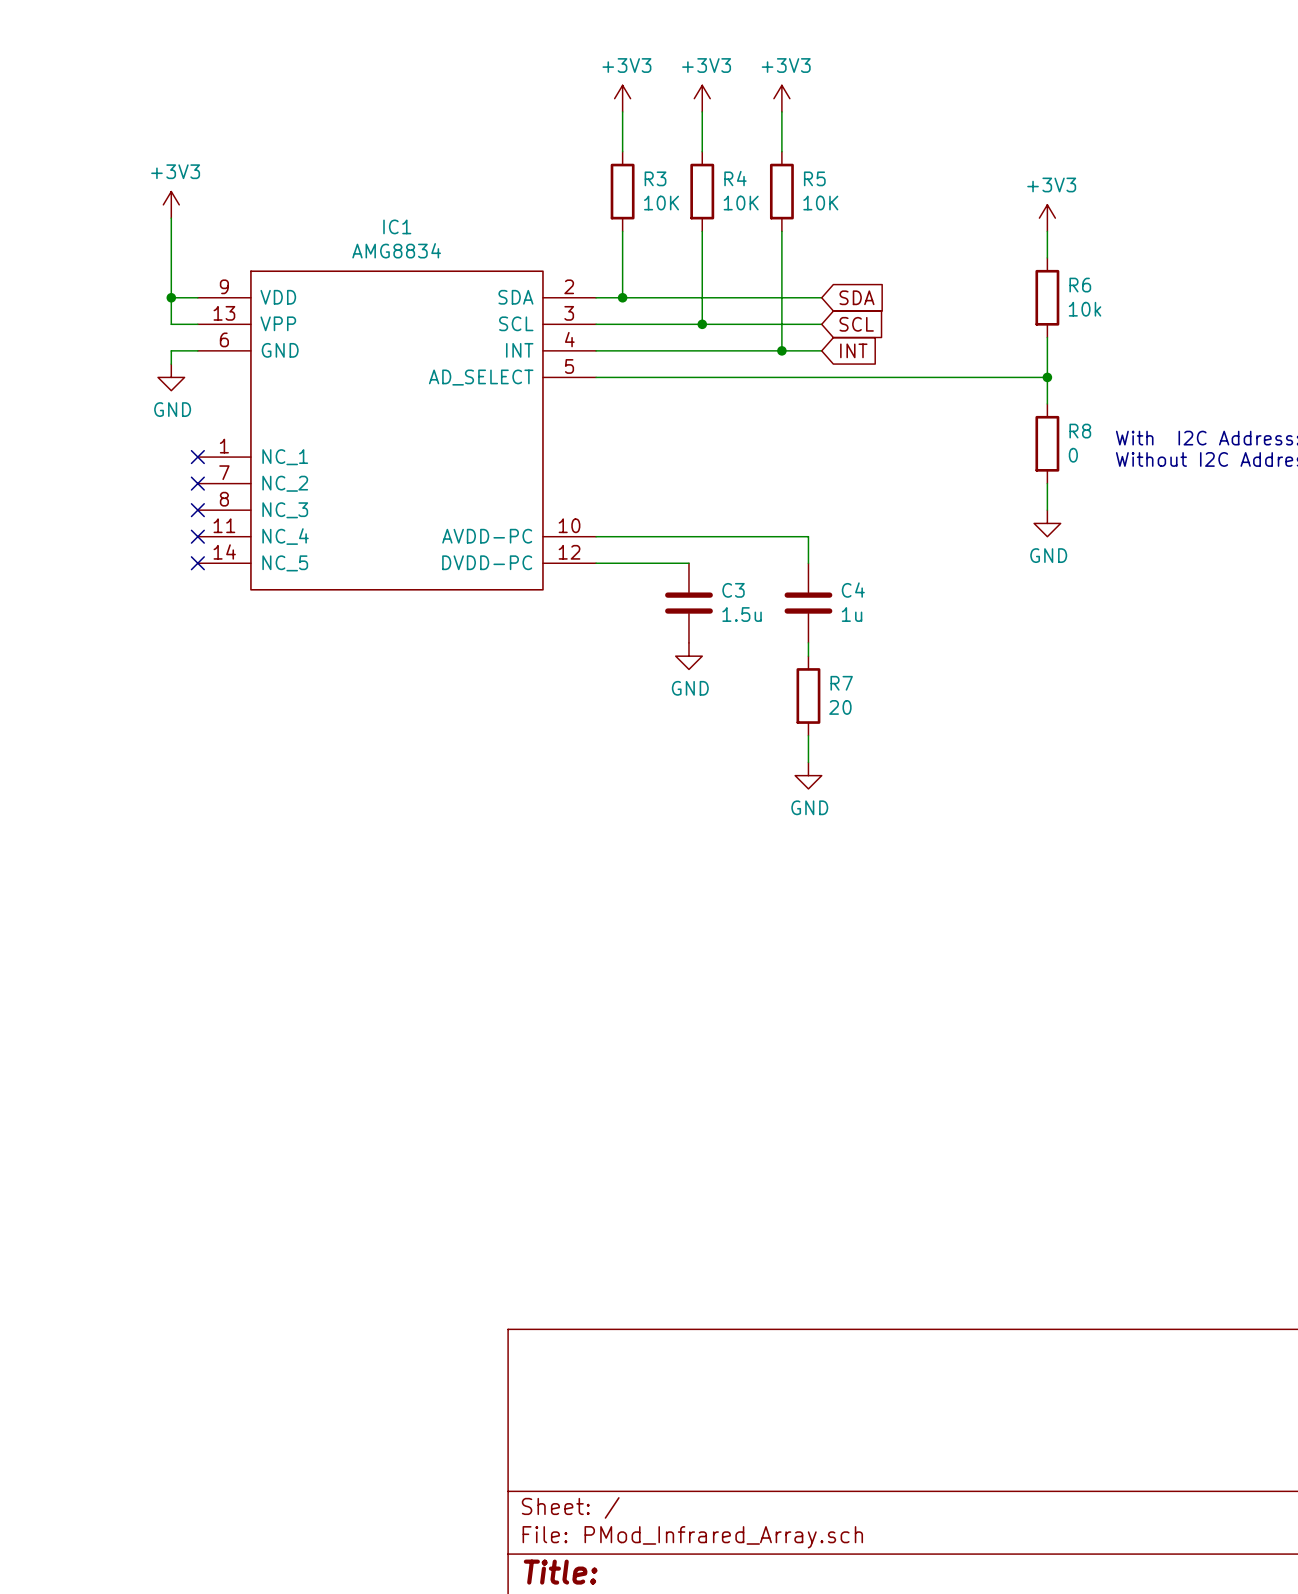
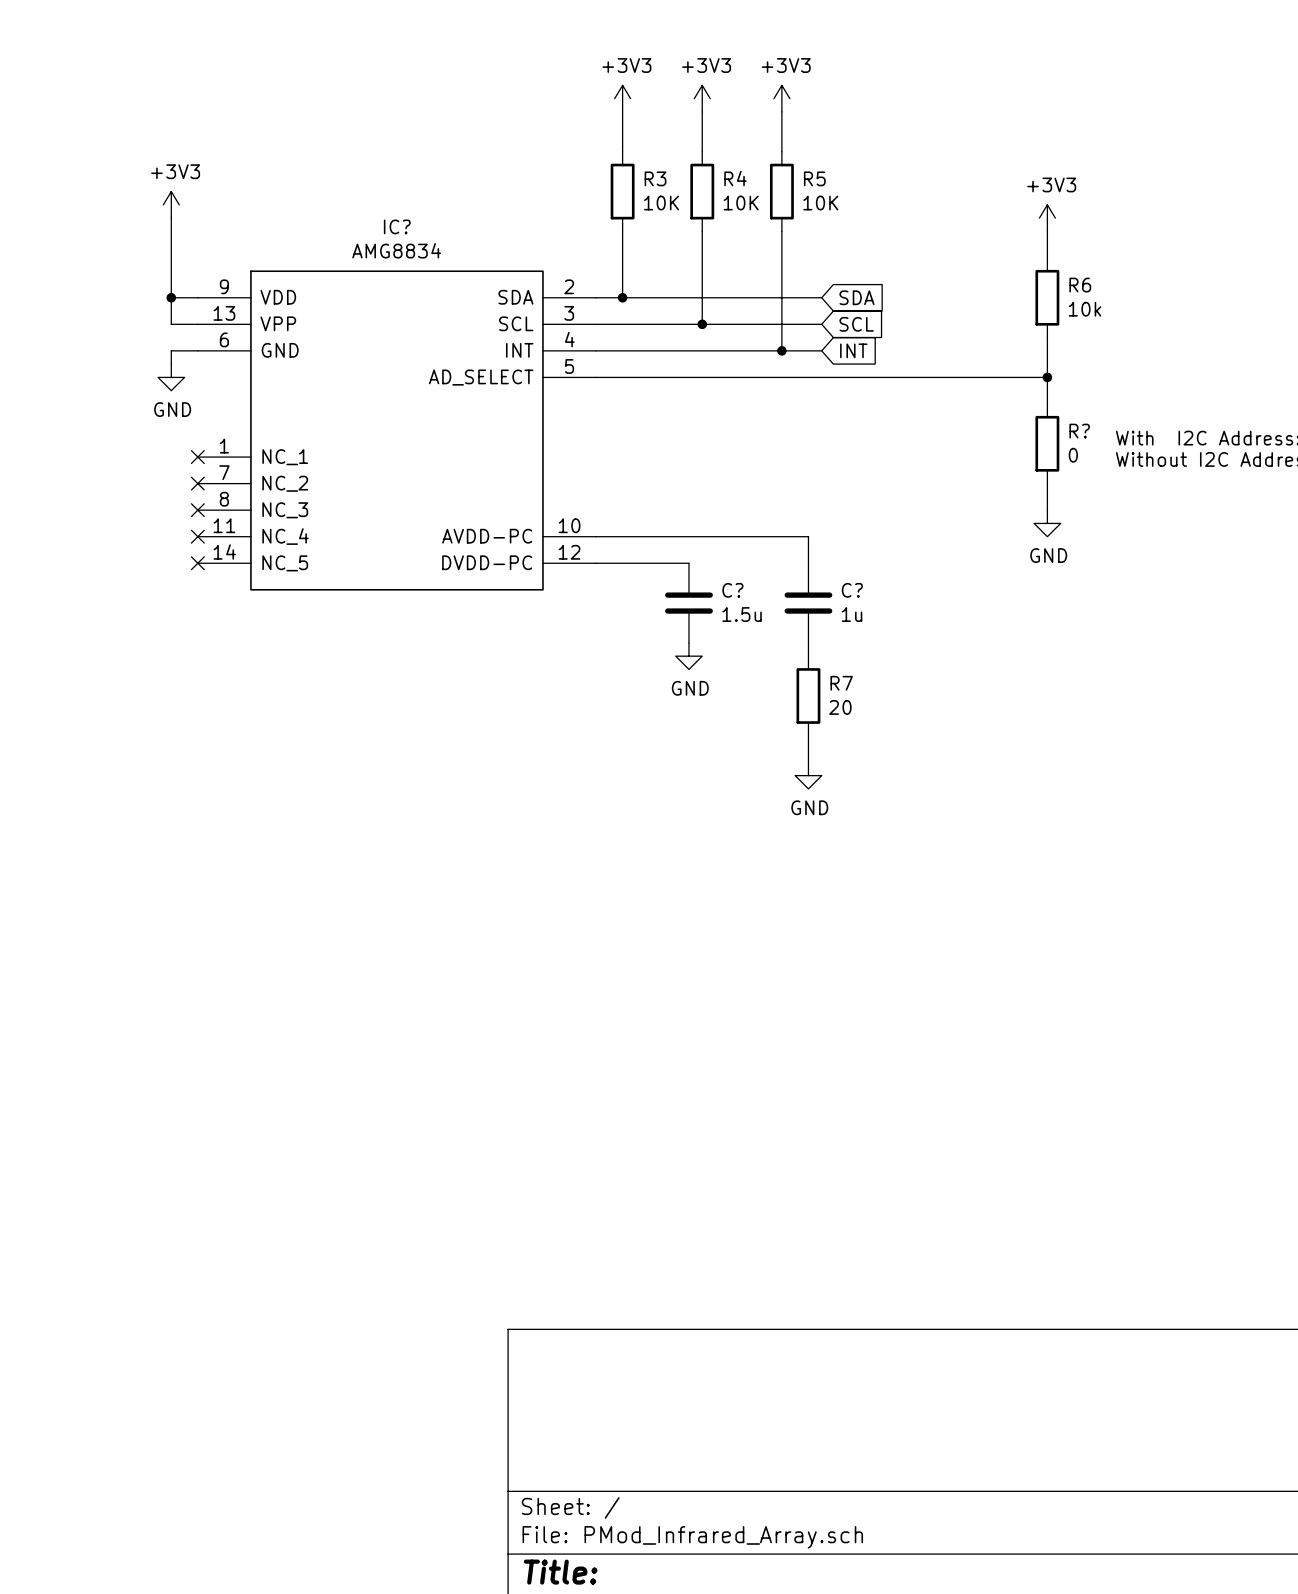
IC1 name: IC1 (397, 226) -> IC? (397, 226)
R8 name: R8 (1080, 431) -> R? (1079, 431)
C3 name: C3 (733, 590) -> C? (732, 590)
C4 name: C4 (853, 590) -> C? (852, 590)

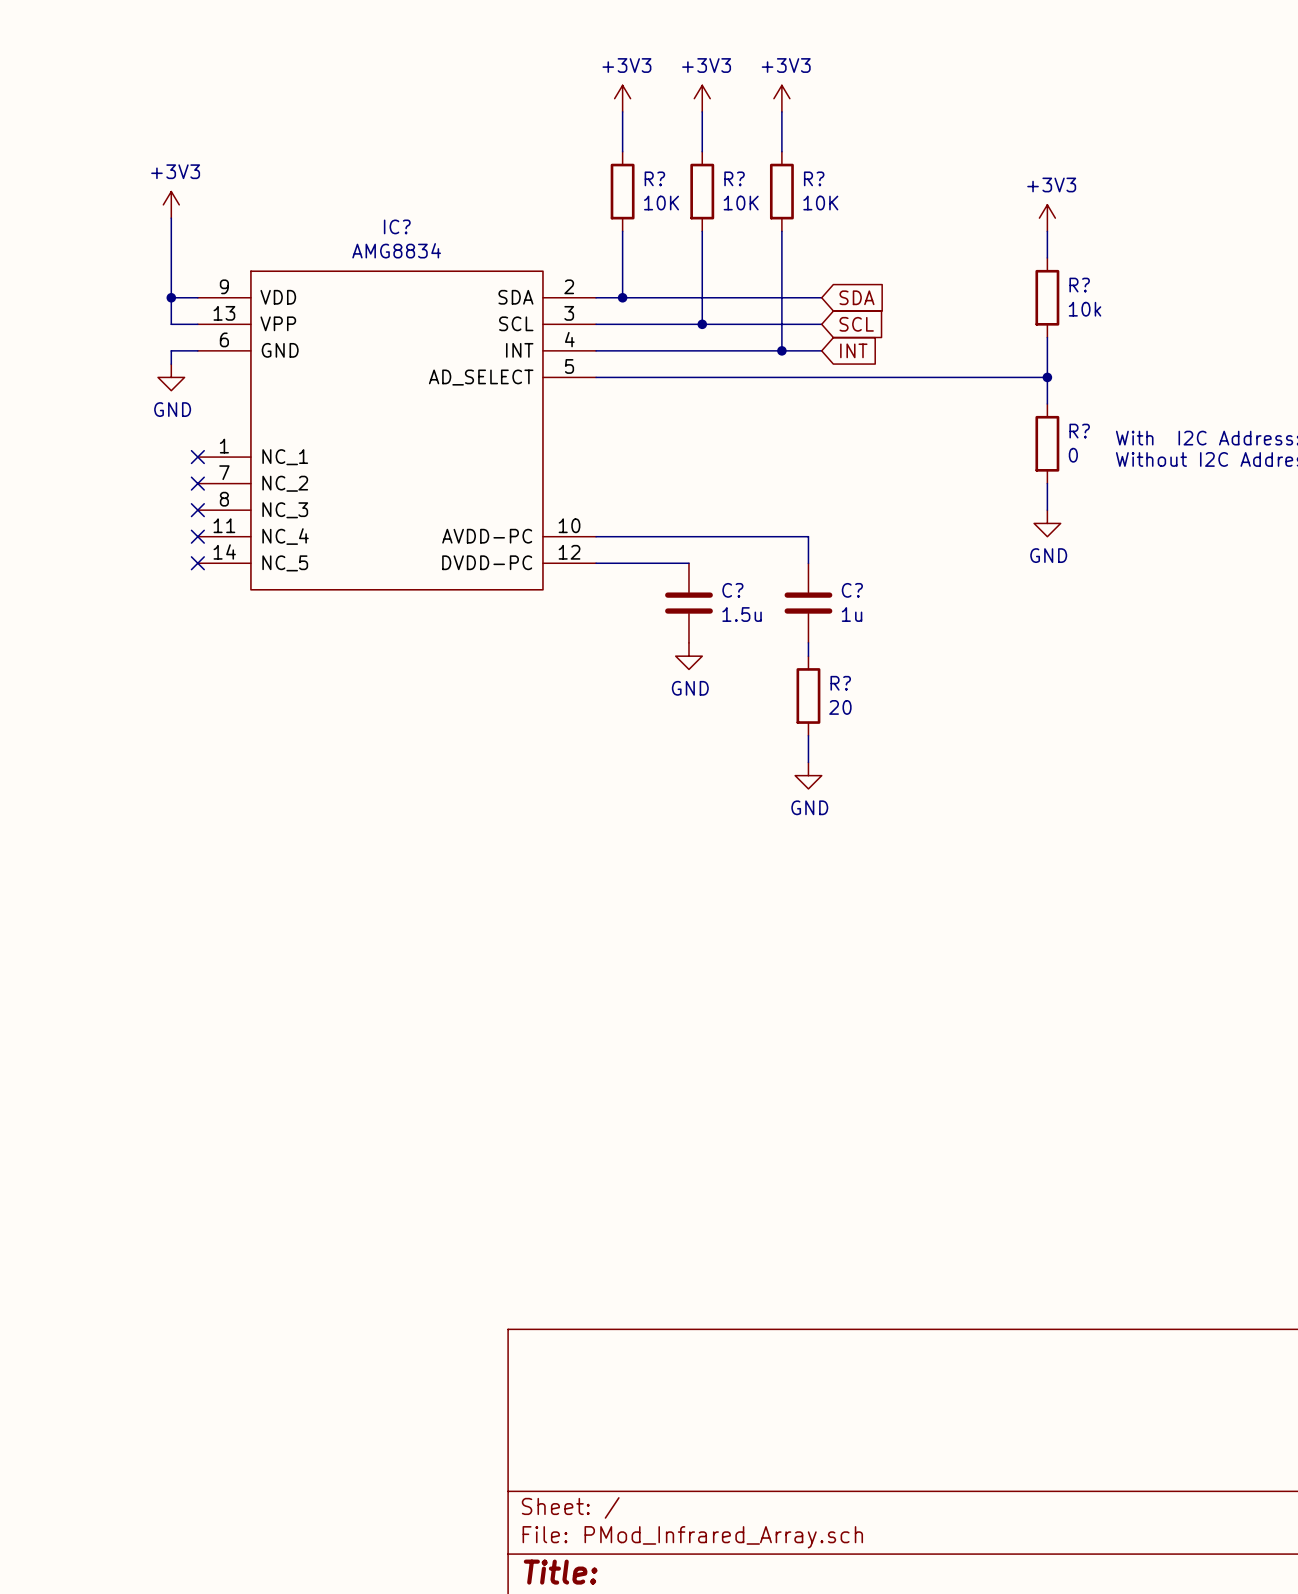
R3 name: R3 (655, 178) -> R? (654, 178)
R4 name: R4 (735, 178) -> R? (734, 178)
R5 name: R5 (814, 178) -> R? (814, 178)
R6 name: R6 (1080, 285) -> R? (1079, 285)
R7 name: R7 (841, 683) -> R? (840, 683)

